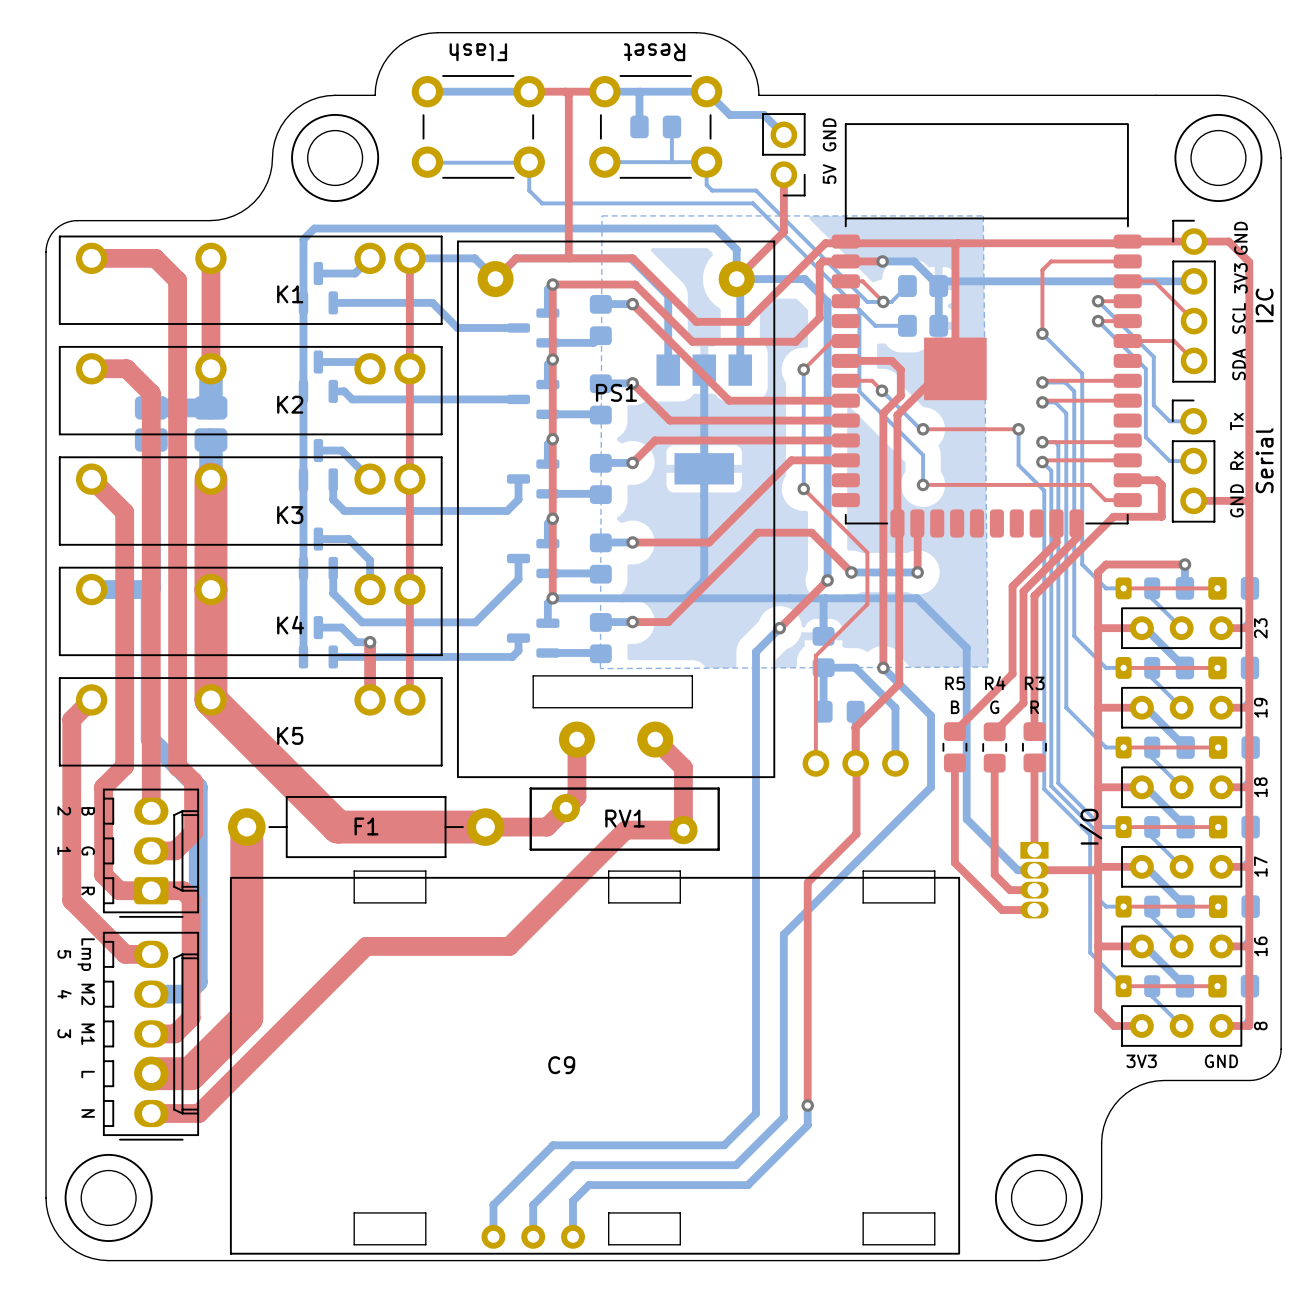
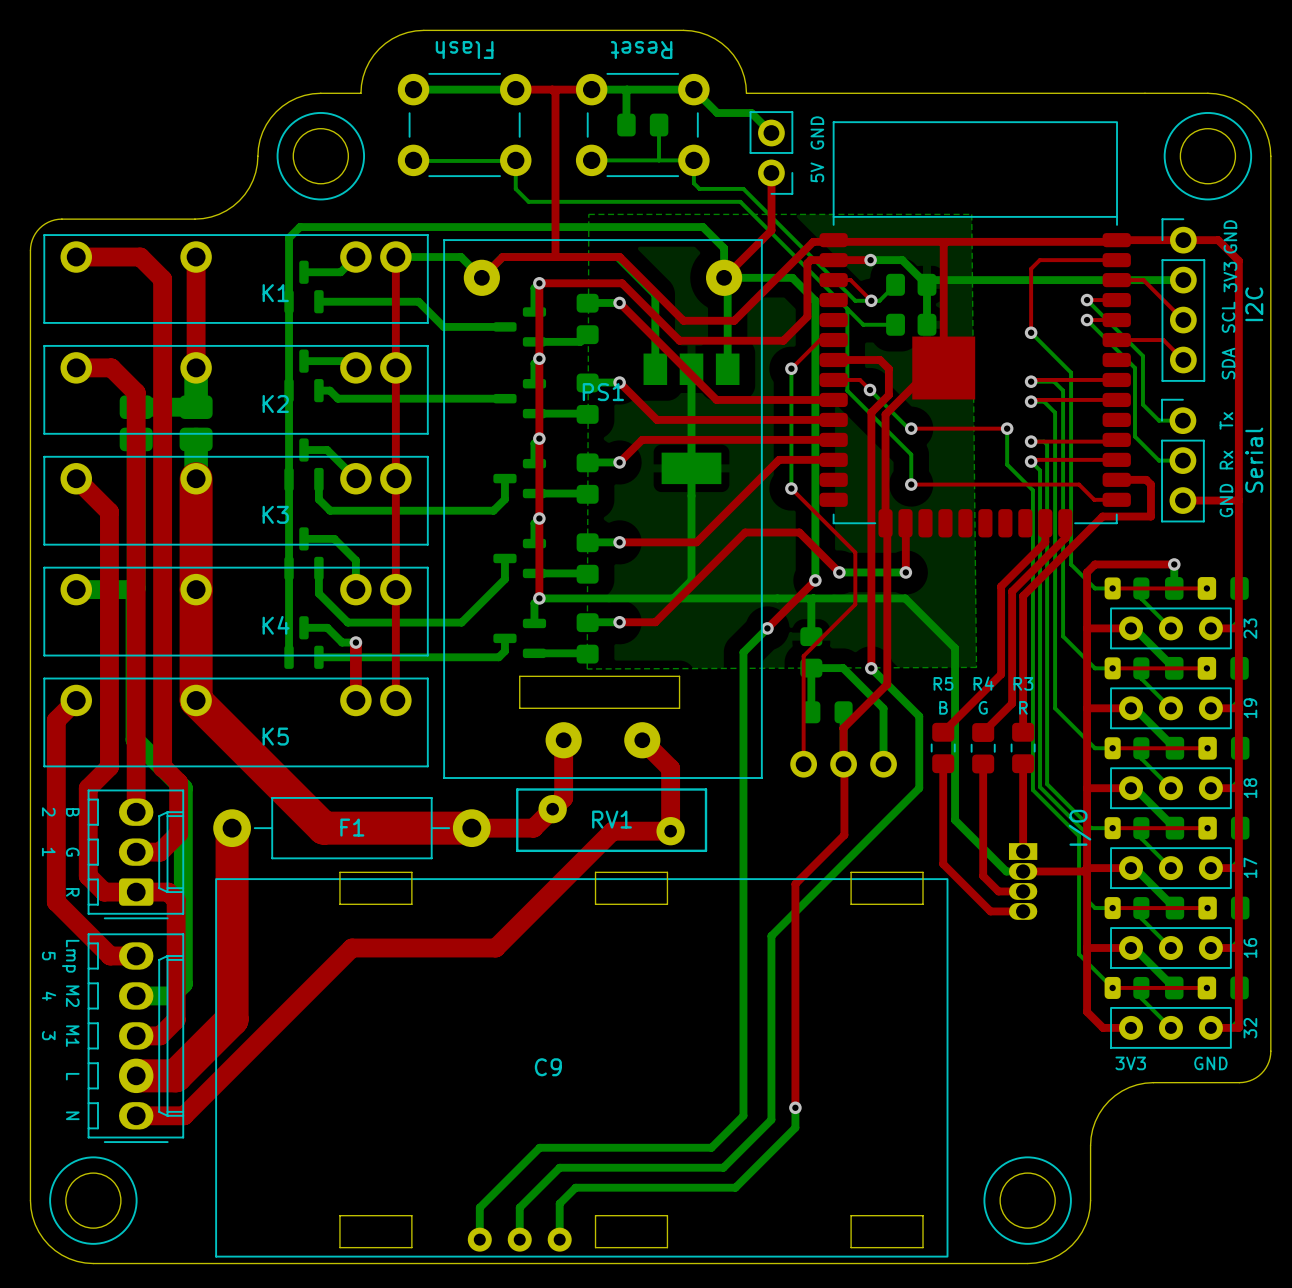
part text: 8 (1260, 1025) -> 32 (1250, 1028)

